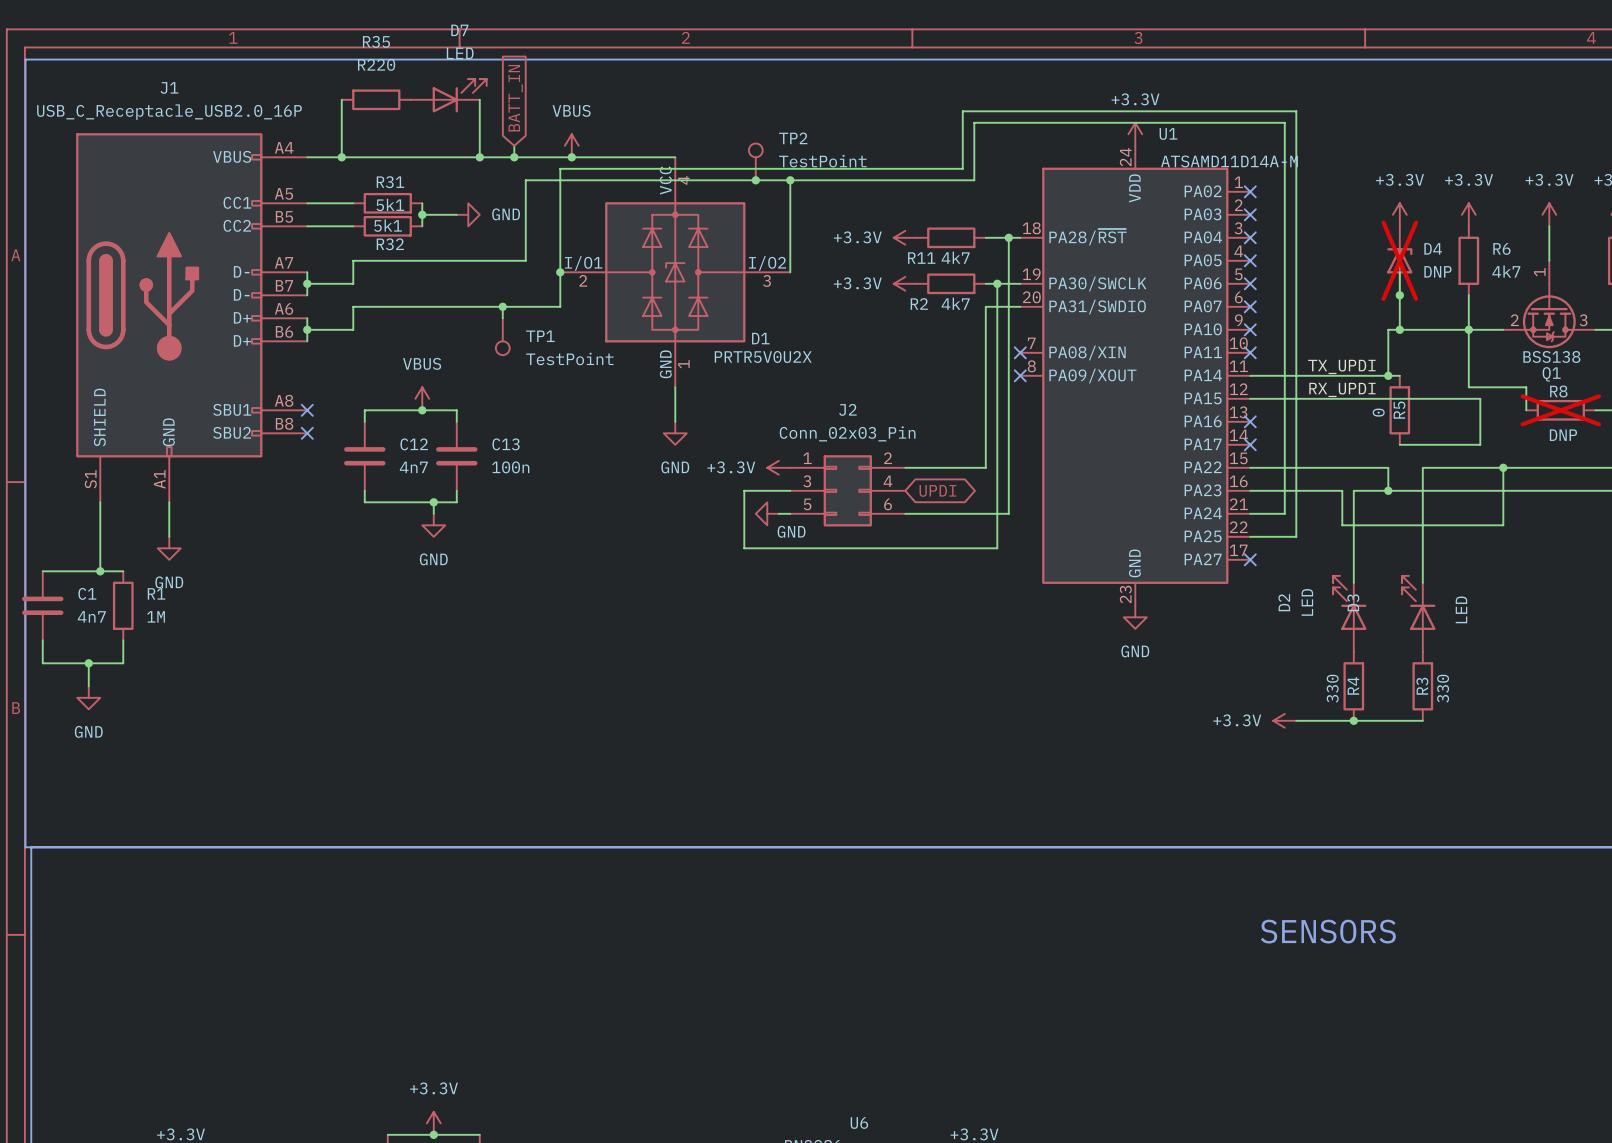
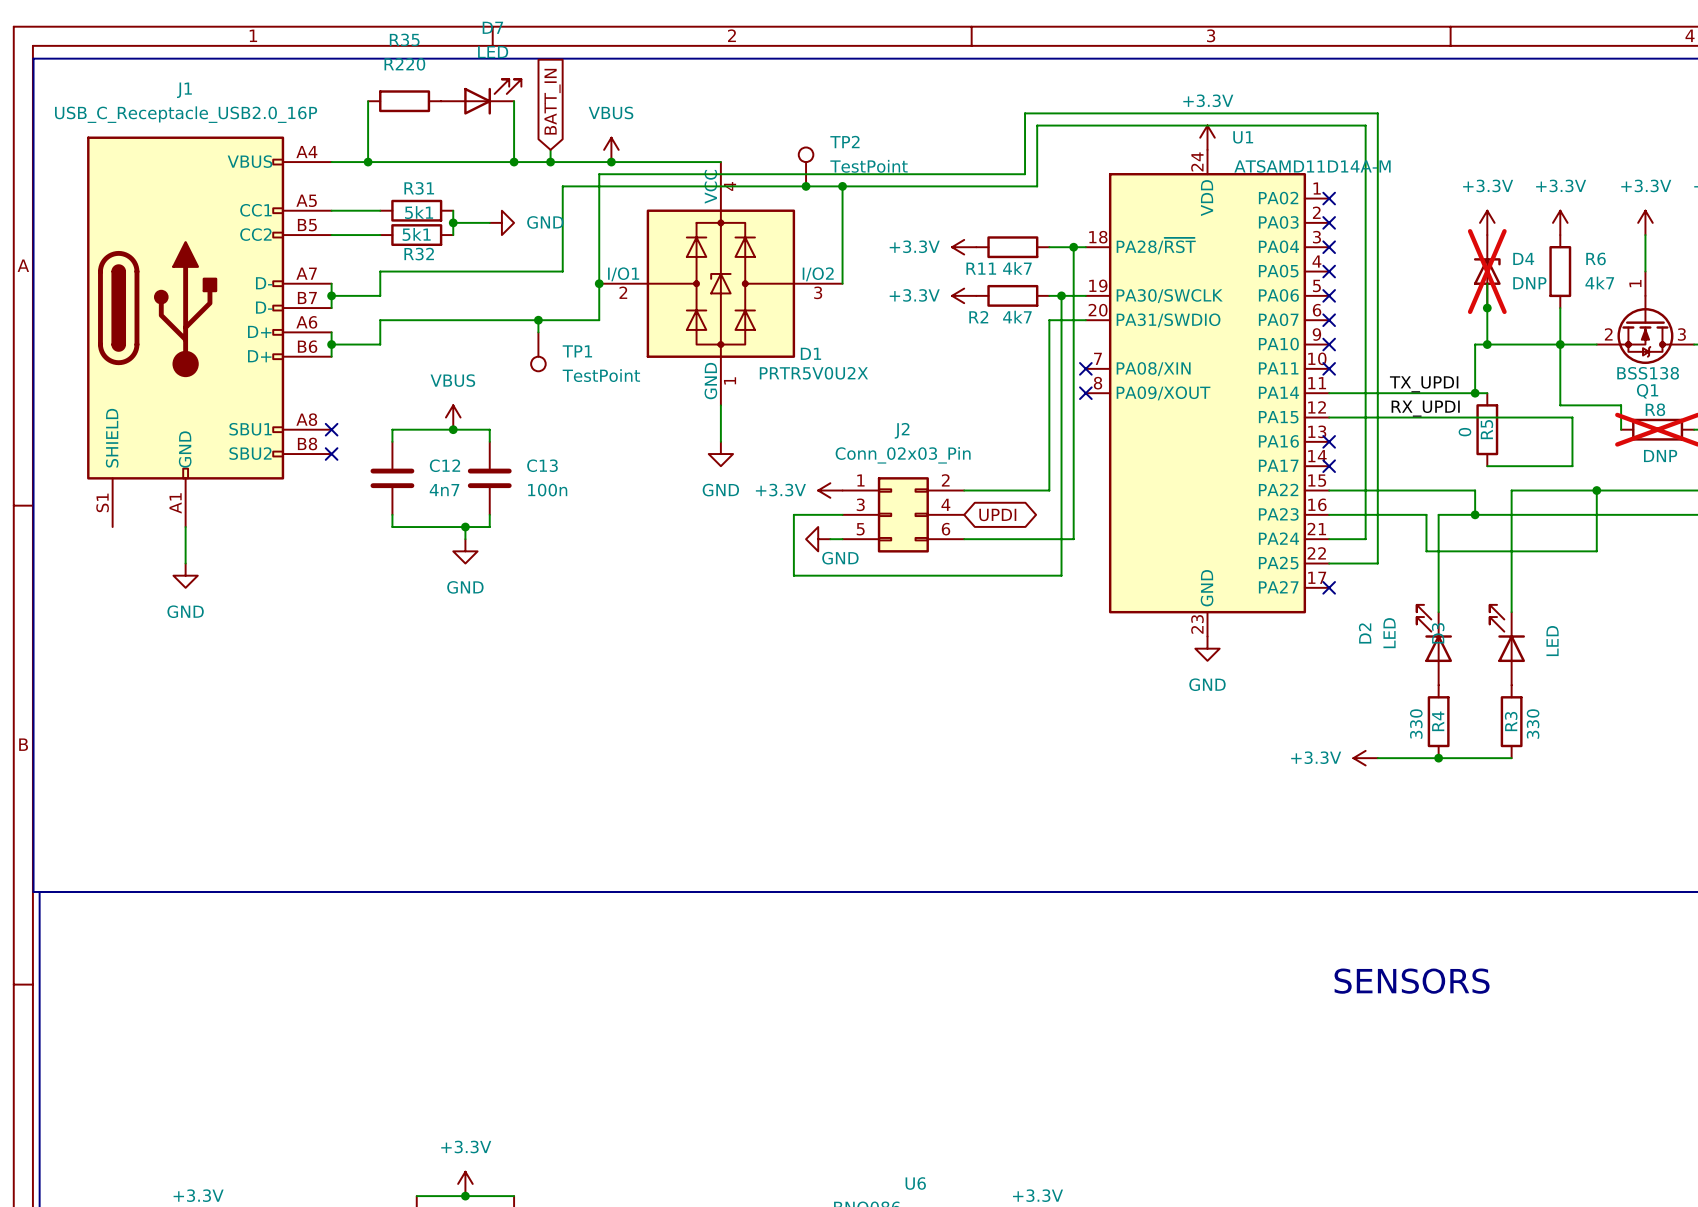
wire: (100, 502) (100, 571) -> none
wire: (42, 571) (123, 571) -> none
junction: (100, 571) -> none
C1: 4n7 (42, 605) -> none
R1: 1M (123, 605) -> none
wire: (42, 640) (42, 663) (123, 663) (123, 640) -> none
wire: (88, 663) (88, 686) -> none
junction: (88, 663) -> none
power symbol: GND (88, 697) -> none

